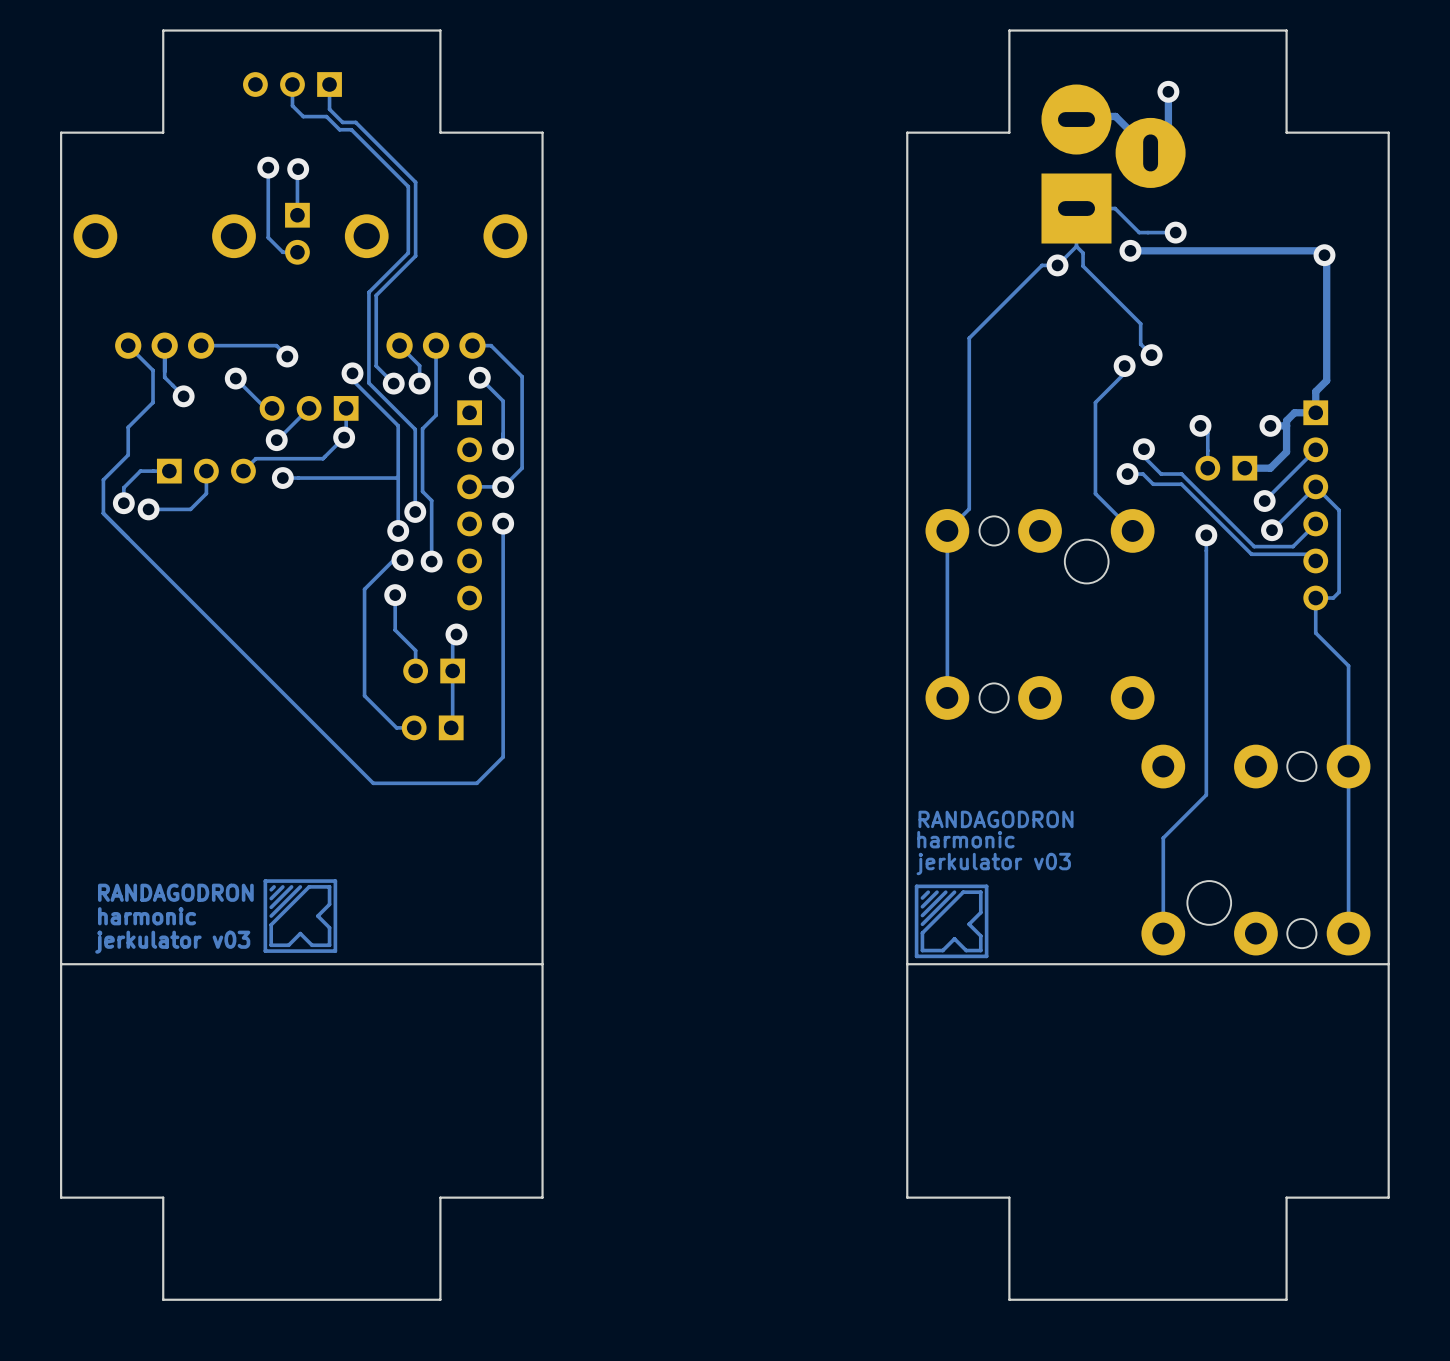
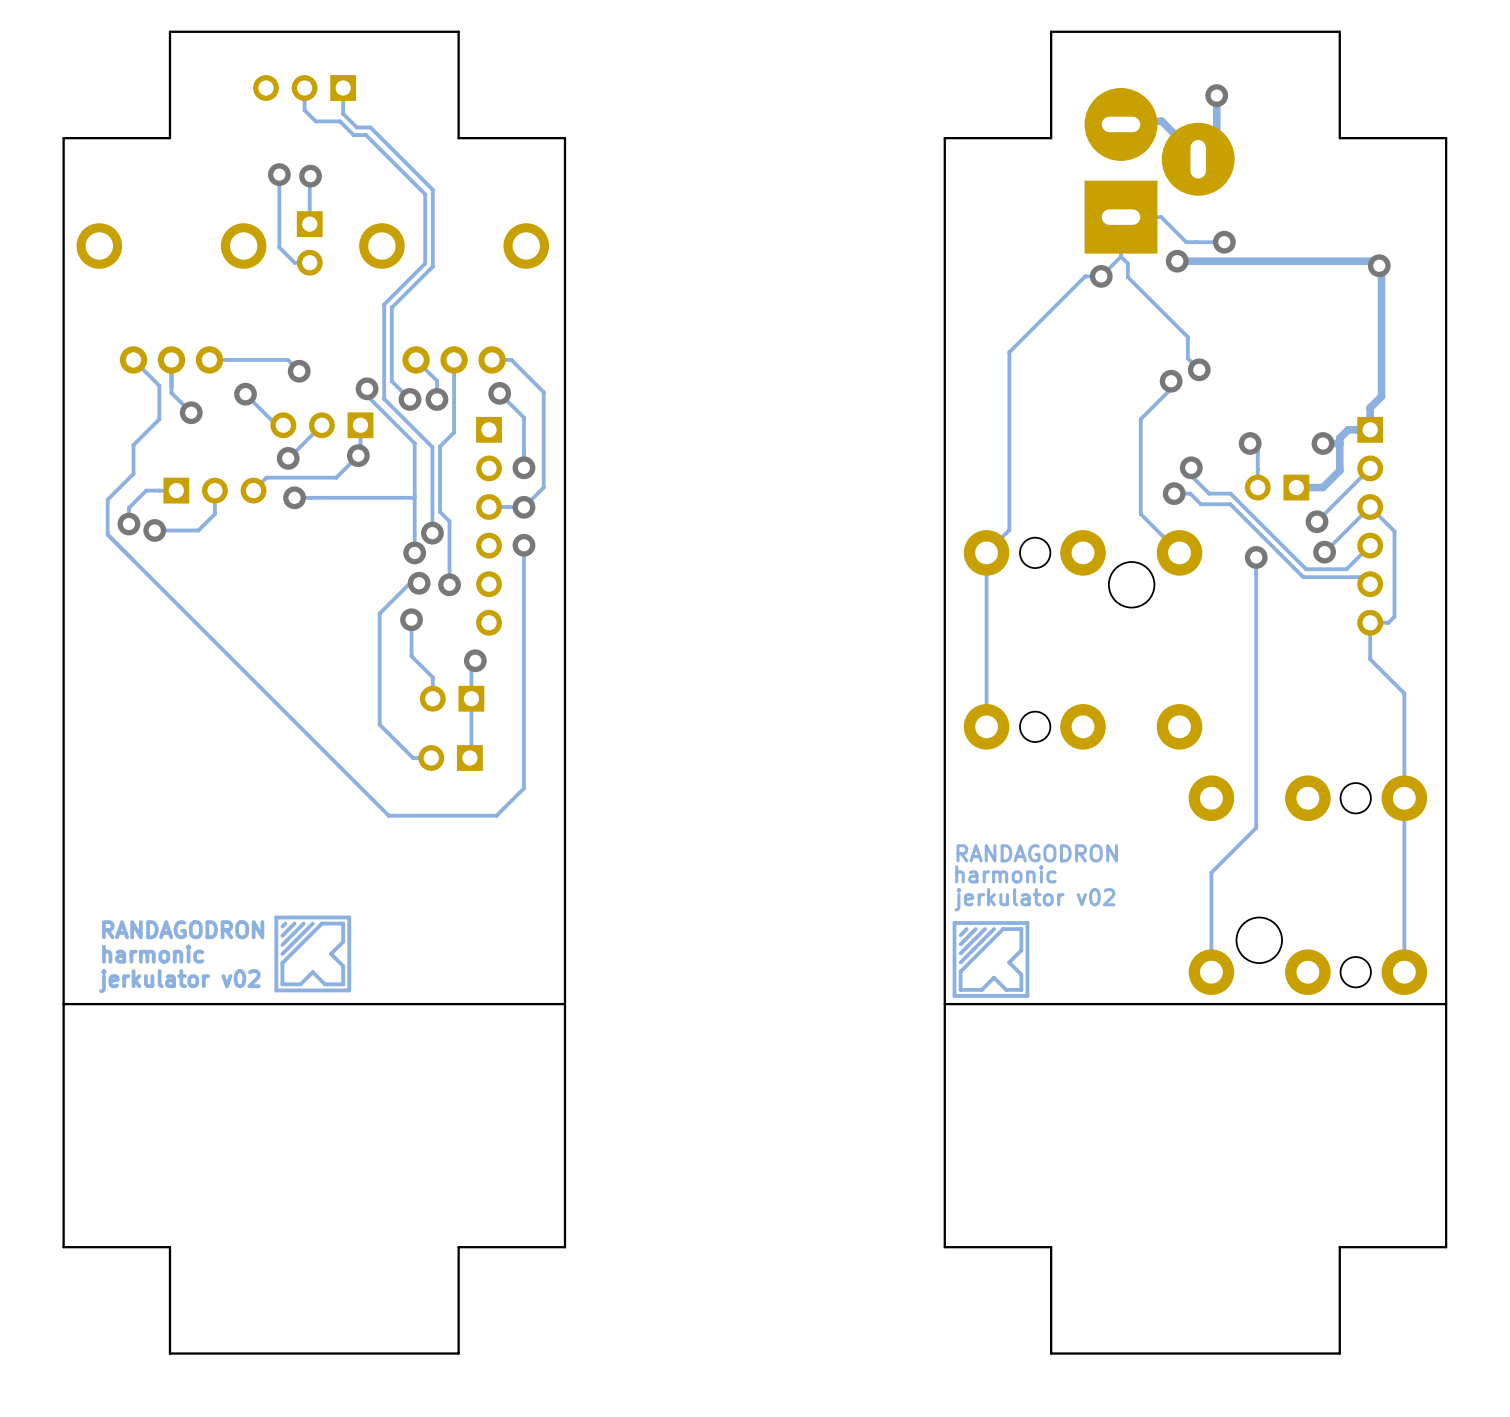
text: jerkulator v03 (993, 863) -> jerkulator v02 (1034, 899)
text: jerkulator v03 (172, 942) -> jerkulator v02 (179, 981)

